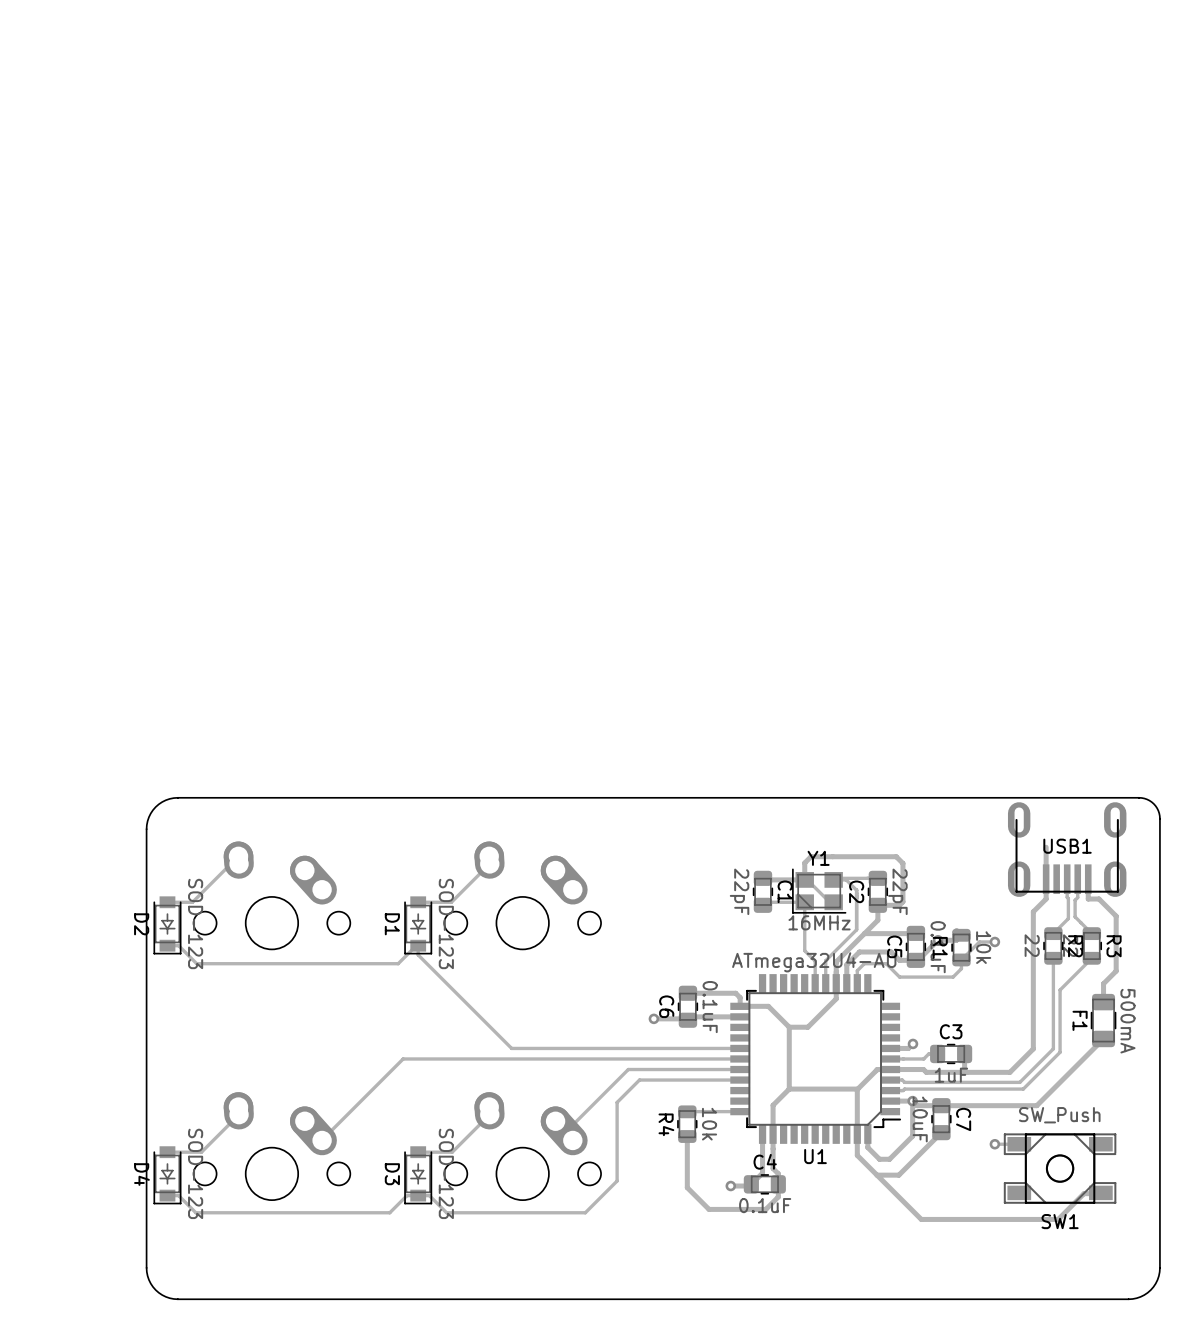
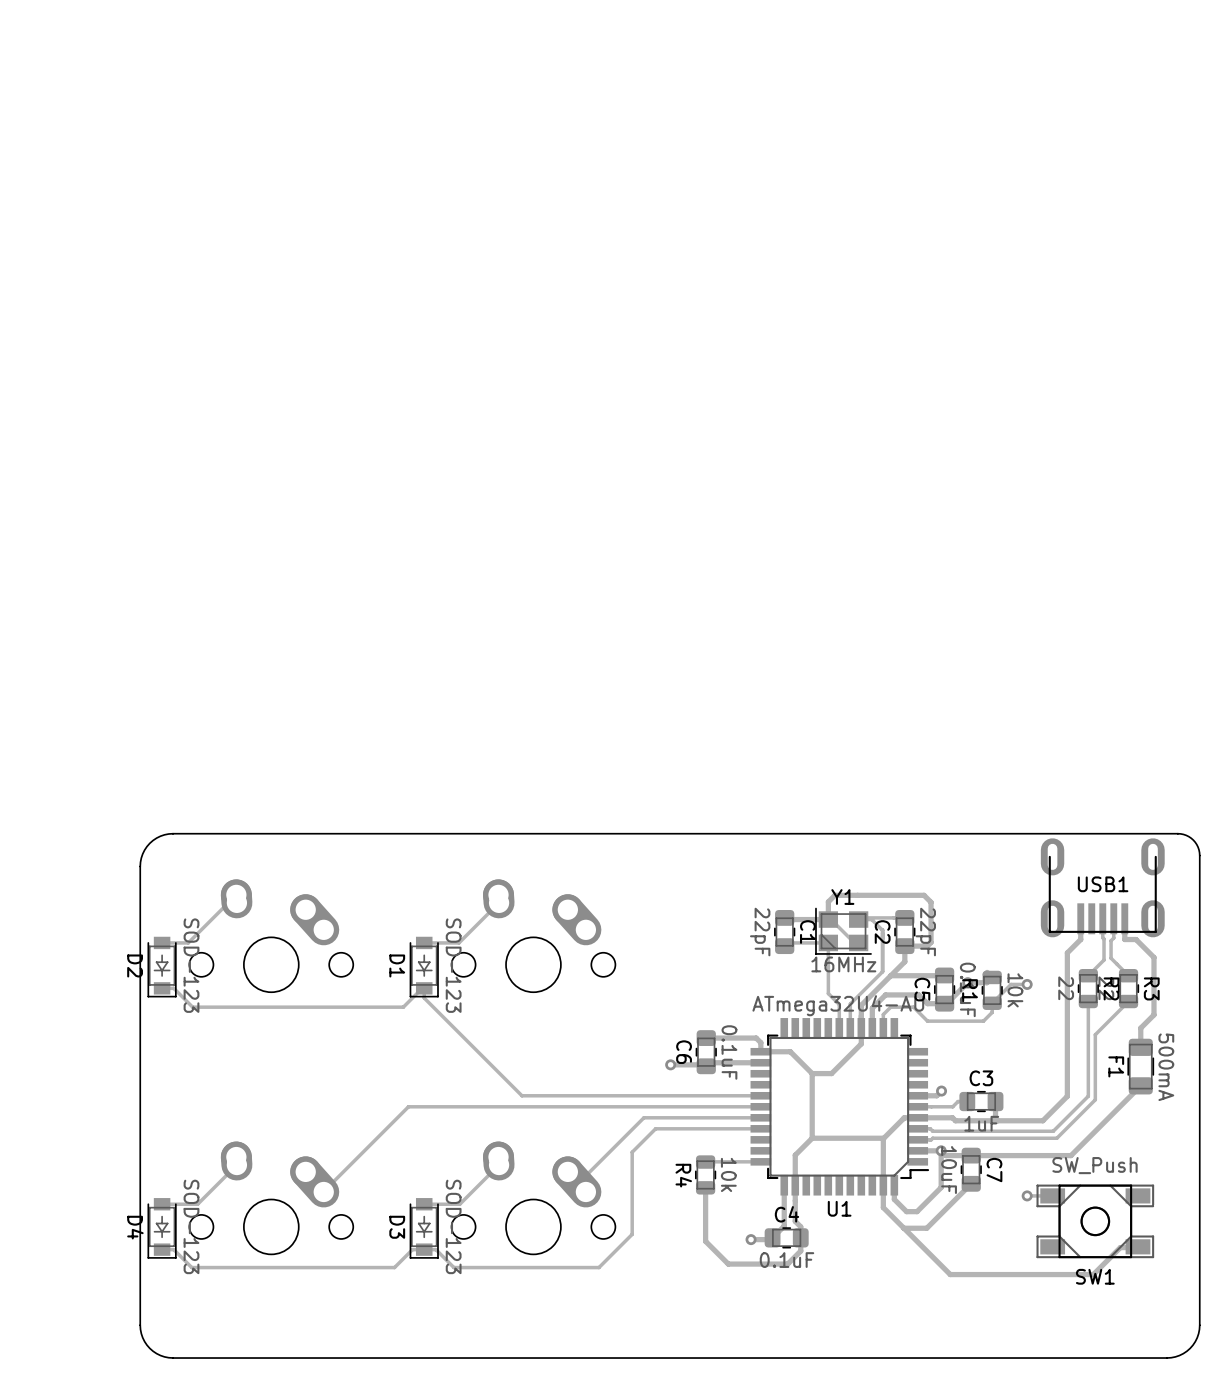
track: (1046, 847) (1046, 879) -> none

